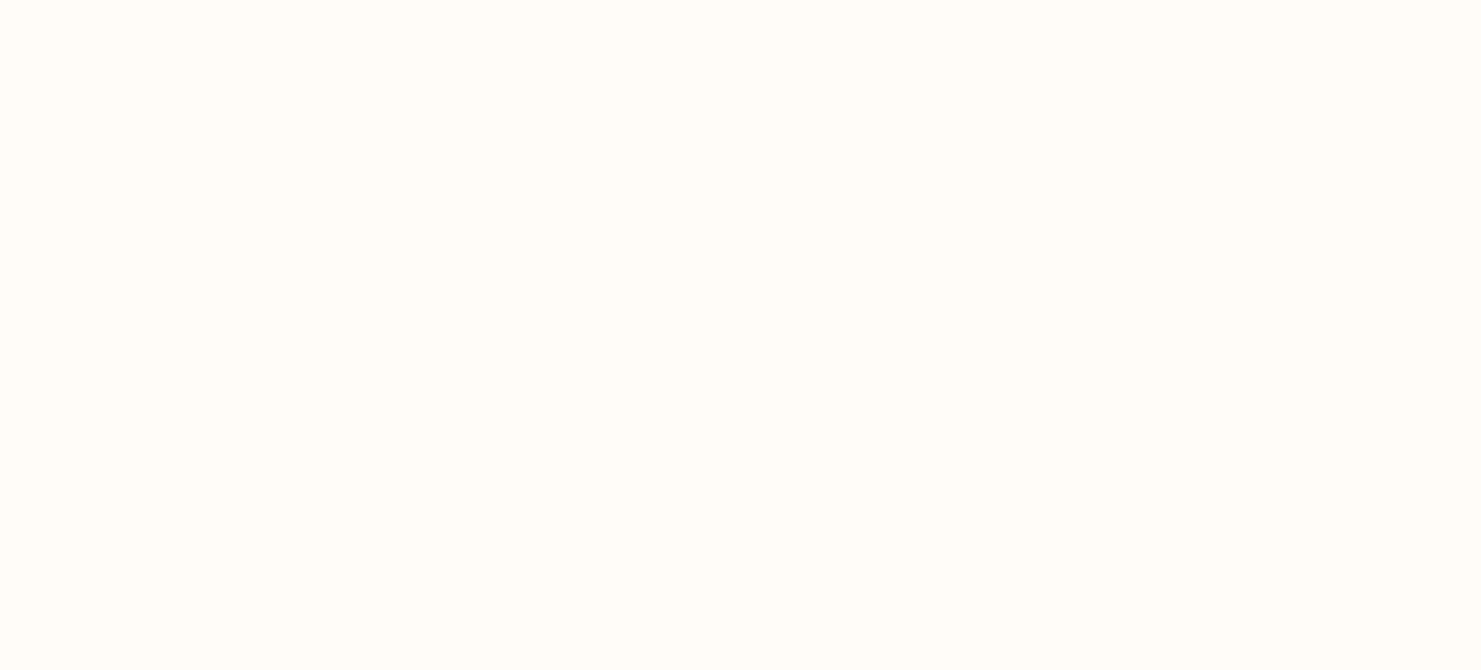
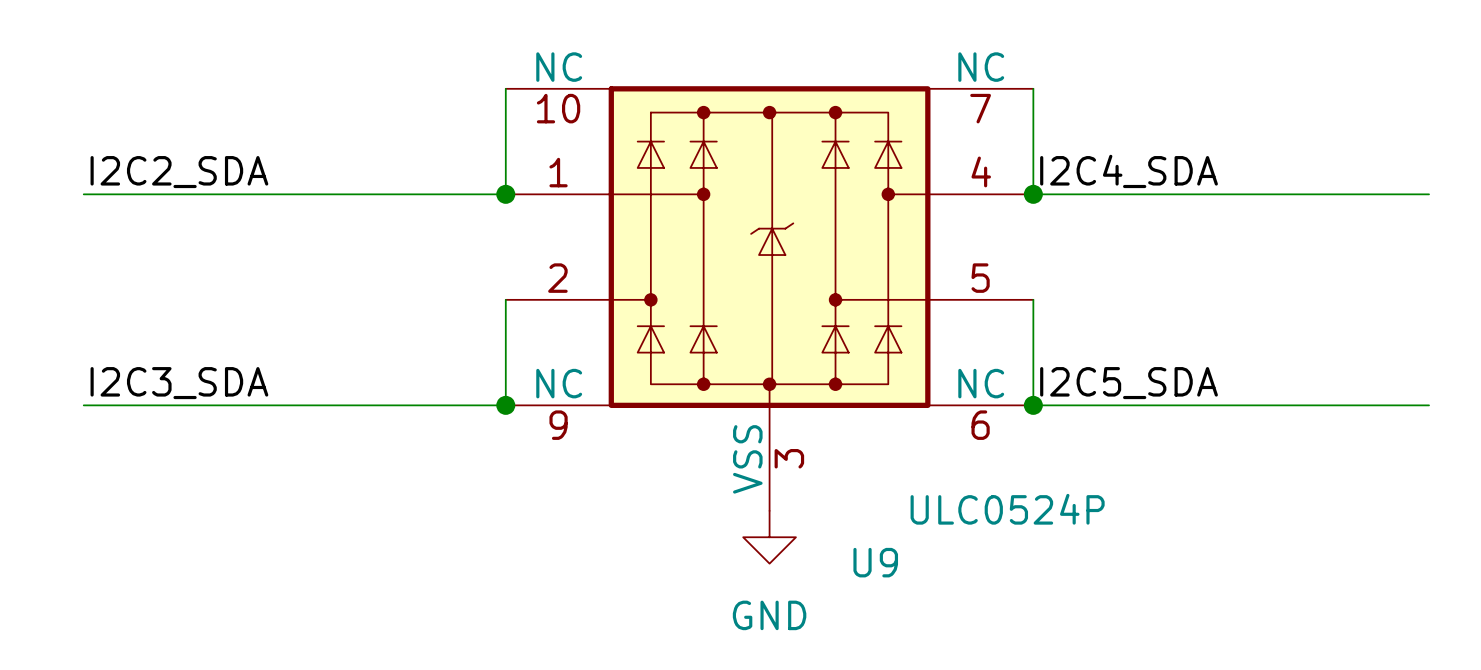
wire: none -> (505, 88) (505, 194) (83, 194)
wire: none -> (1033, 88) (1033, 194) (1429, 194)
label: none -> I2C2_SDA (179, 172)
label: none -> I2C4_SDA (1129, 171)
junction: none -> (505, 194)
junction: none -> (1033, 194)
U9: none -> ULC0524P (769, 298)
wire: none -> (505, 299) (505, 405) (83, 405)
wire: none -> (1033, 299) (1033, 405) (1429, 405)
label: none -> I2C3_SDA (179, 383)
label: none -> I2C5_SDA (1129, 383)
junction: none -> (505, 405)
junction: none -> (1033, 405)
power symbol: none -> GND (769, 537)

